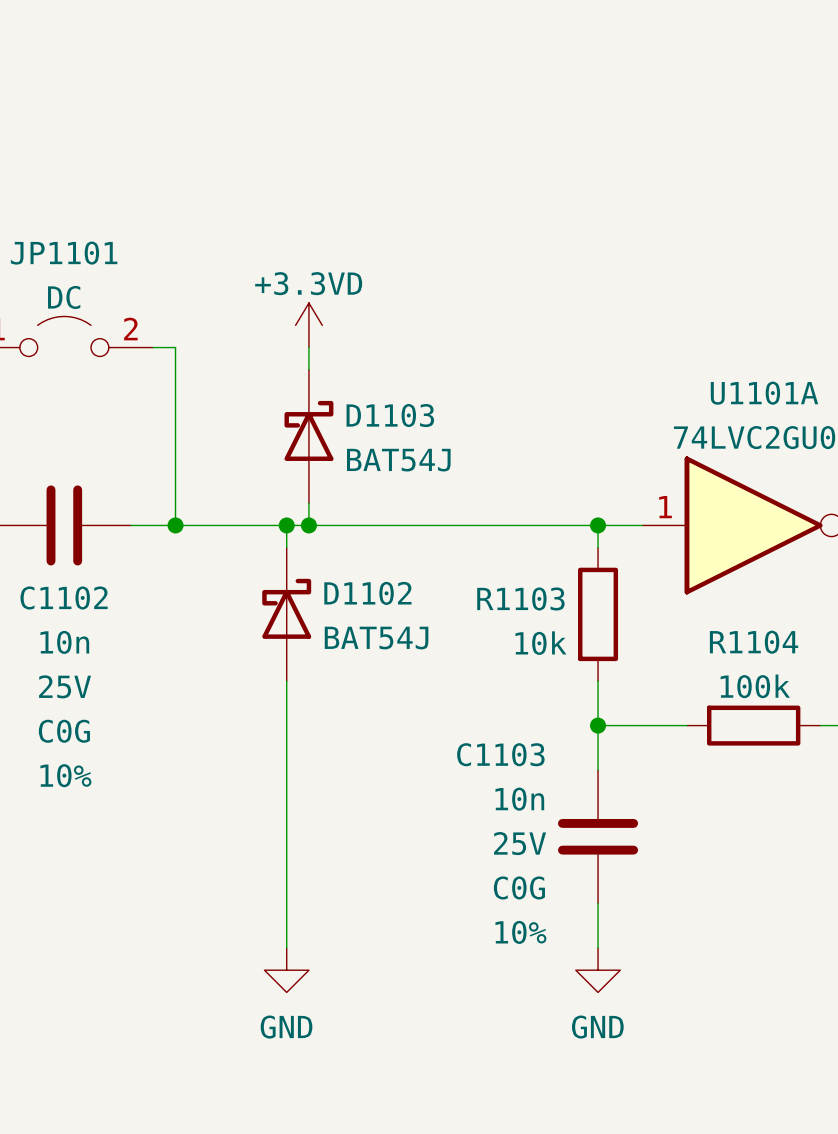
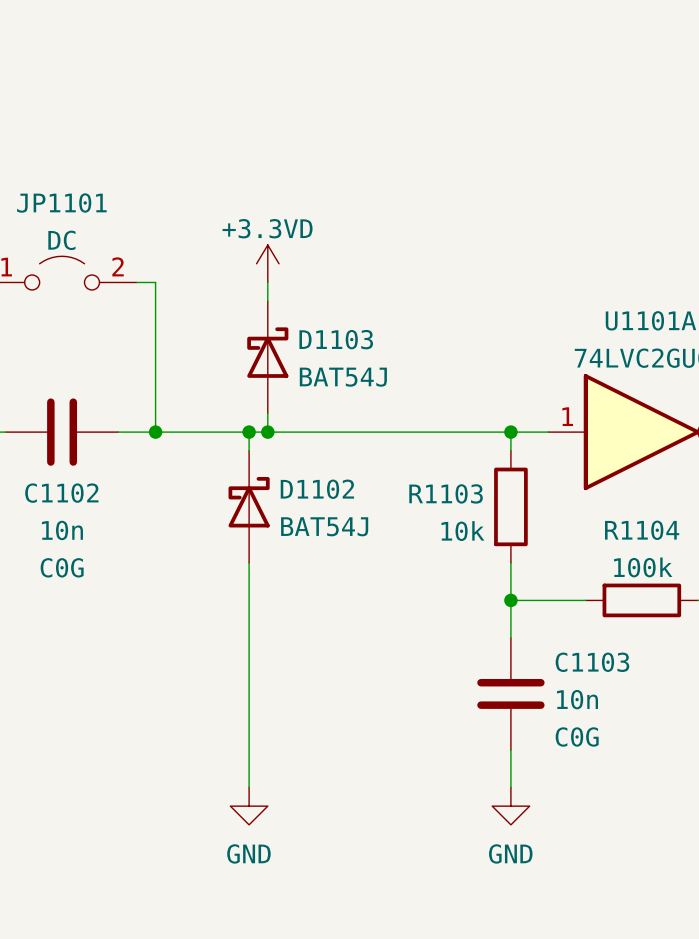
C1102 text: 25V (65, 686) -> none
C1102 text position: C0G (64, 731) -> C0G (62, 567)
C1103 name position: C1103 (500, 754) -> C1103 (592, 662)
C1102 text: 10% (65, 775) -> none
C1103 value position: 10n (519, 799) -> 10n (577, 699)
C1103 text: 25V (520, 843) -> none
C1103 text position: C0G (519, 887) -> C0G (577, 736)
C1103 text: 10% (520, 932) -> none

